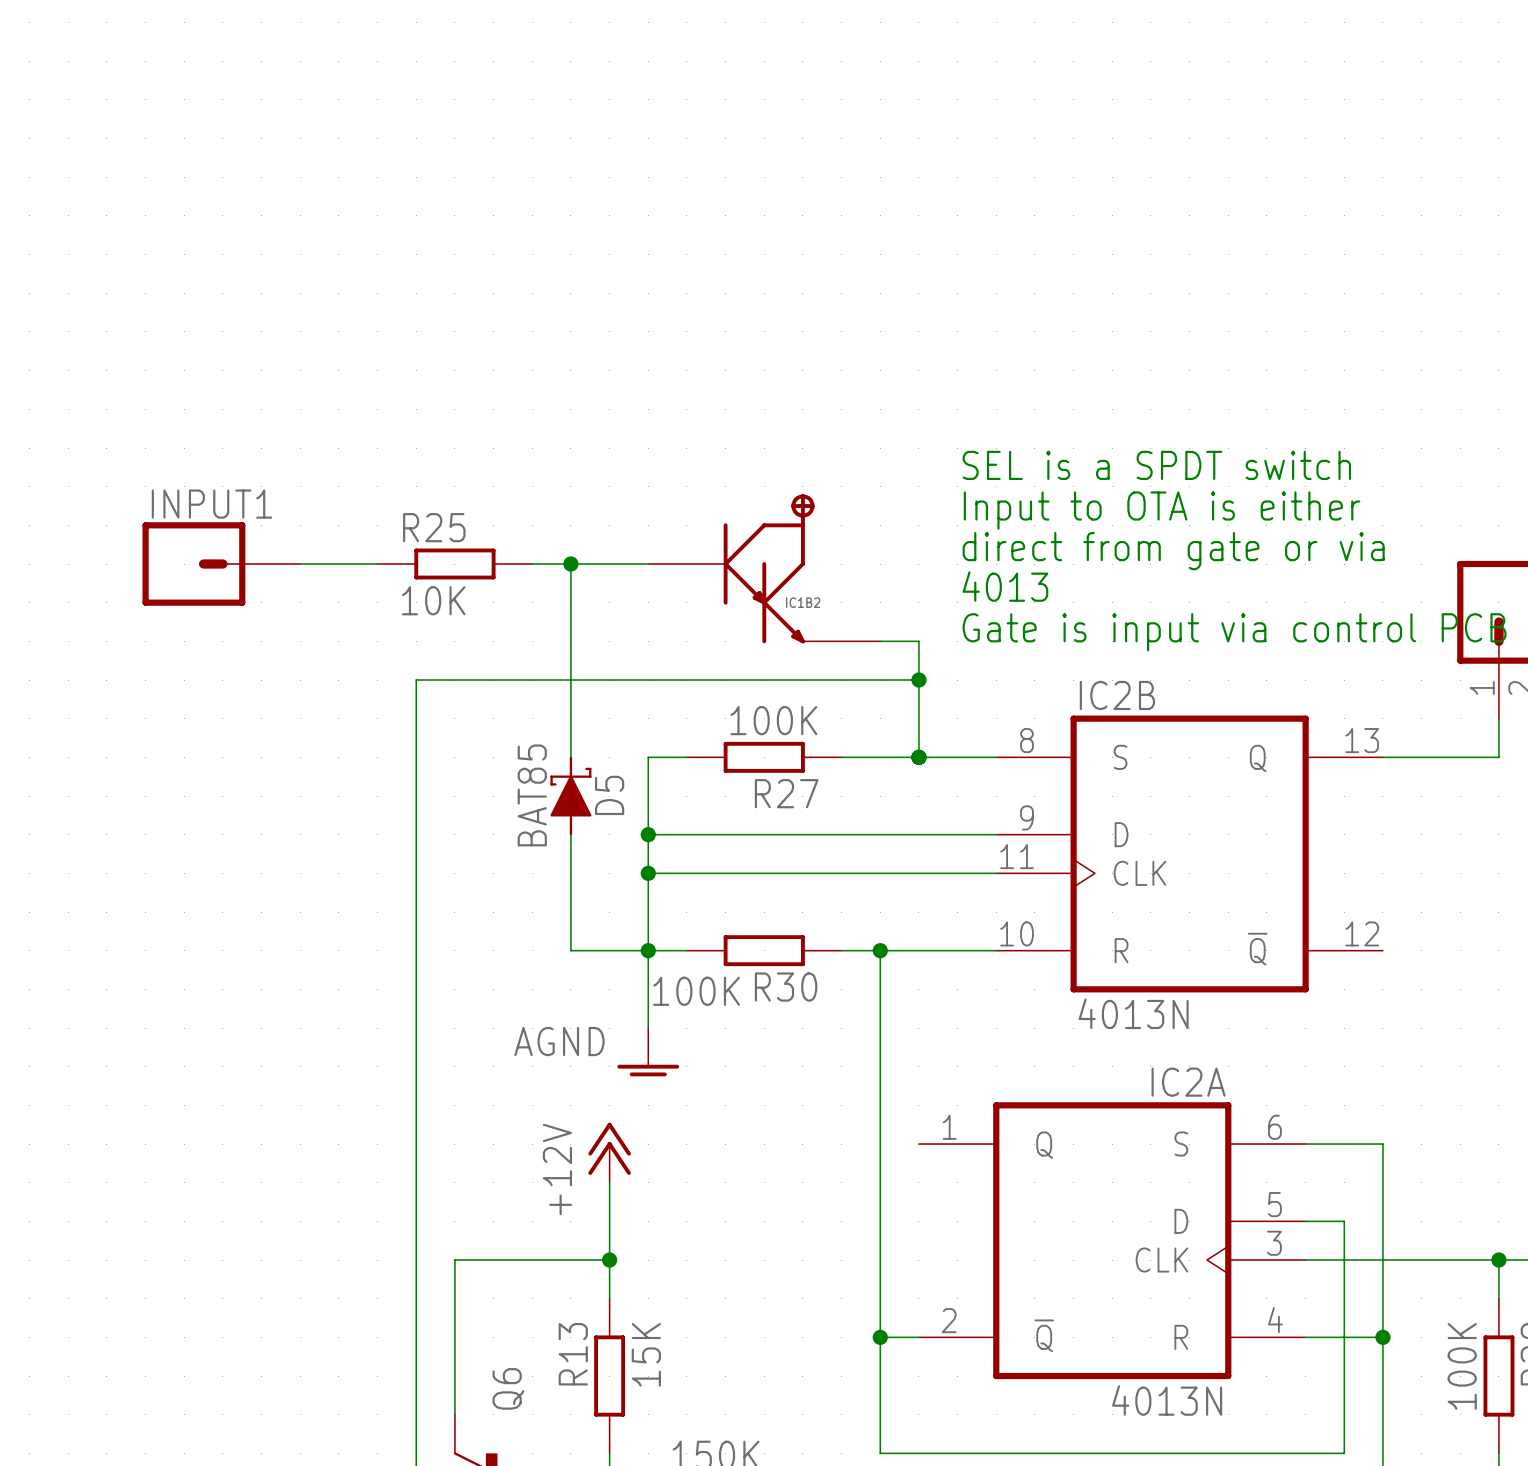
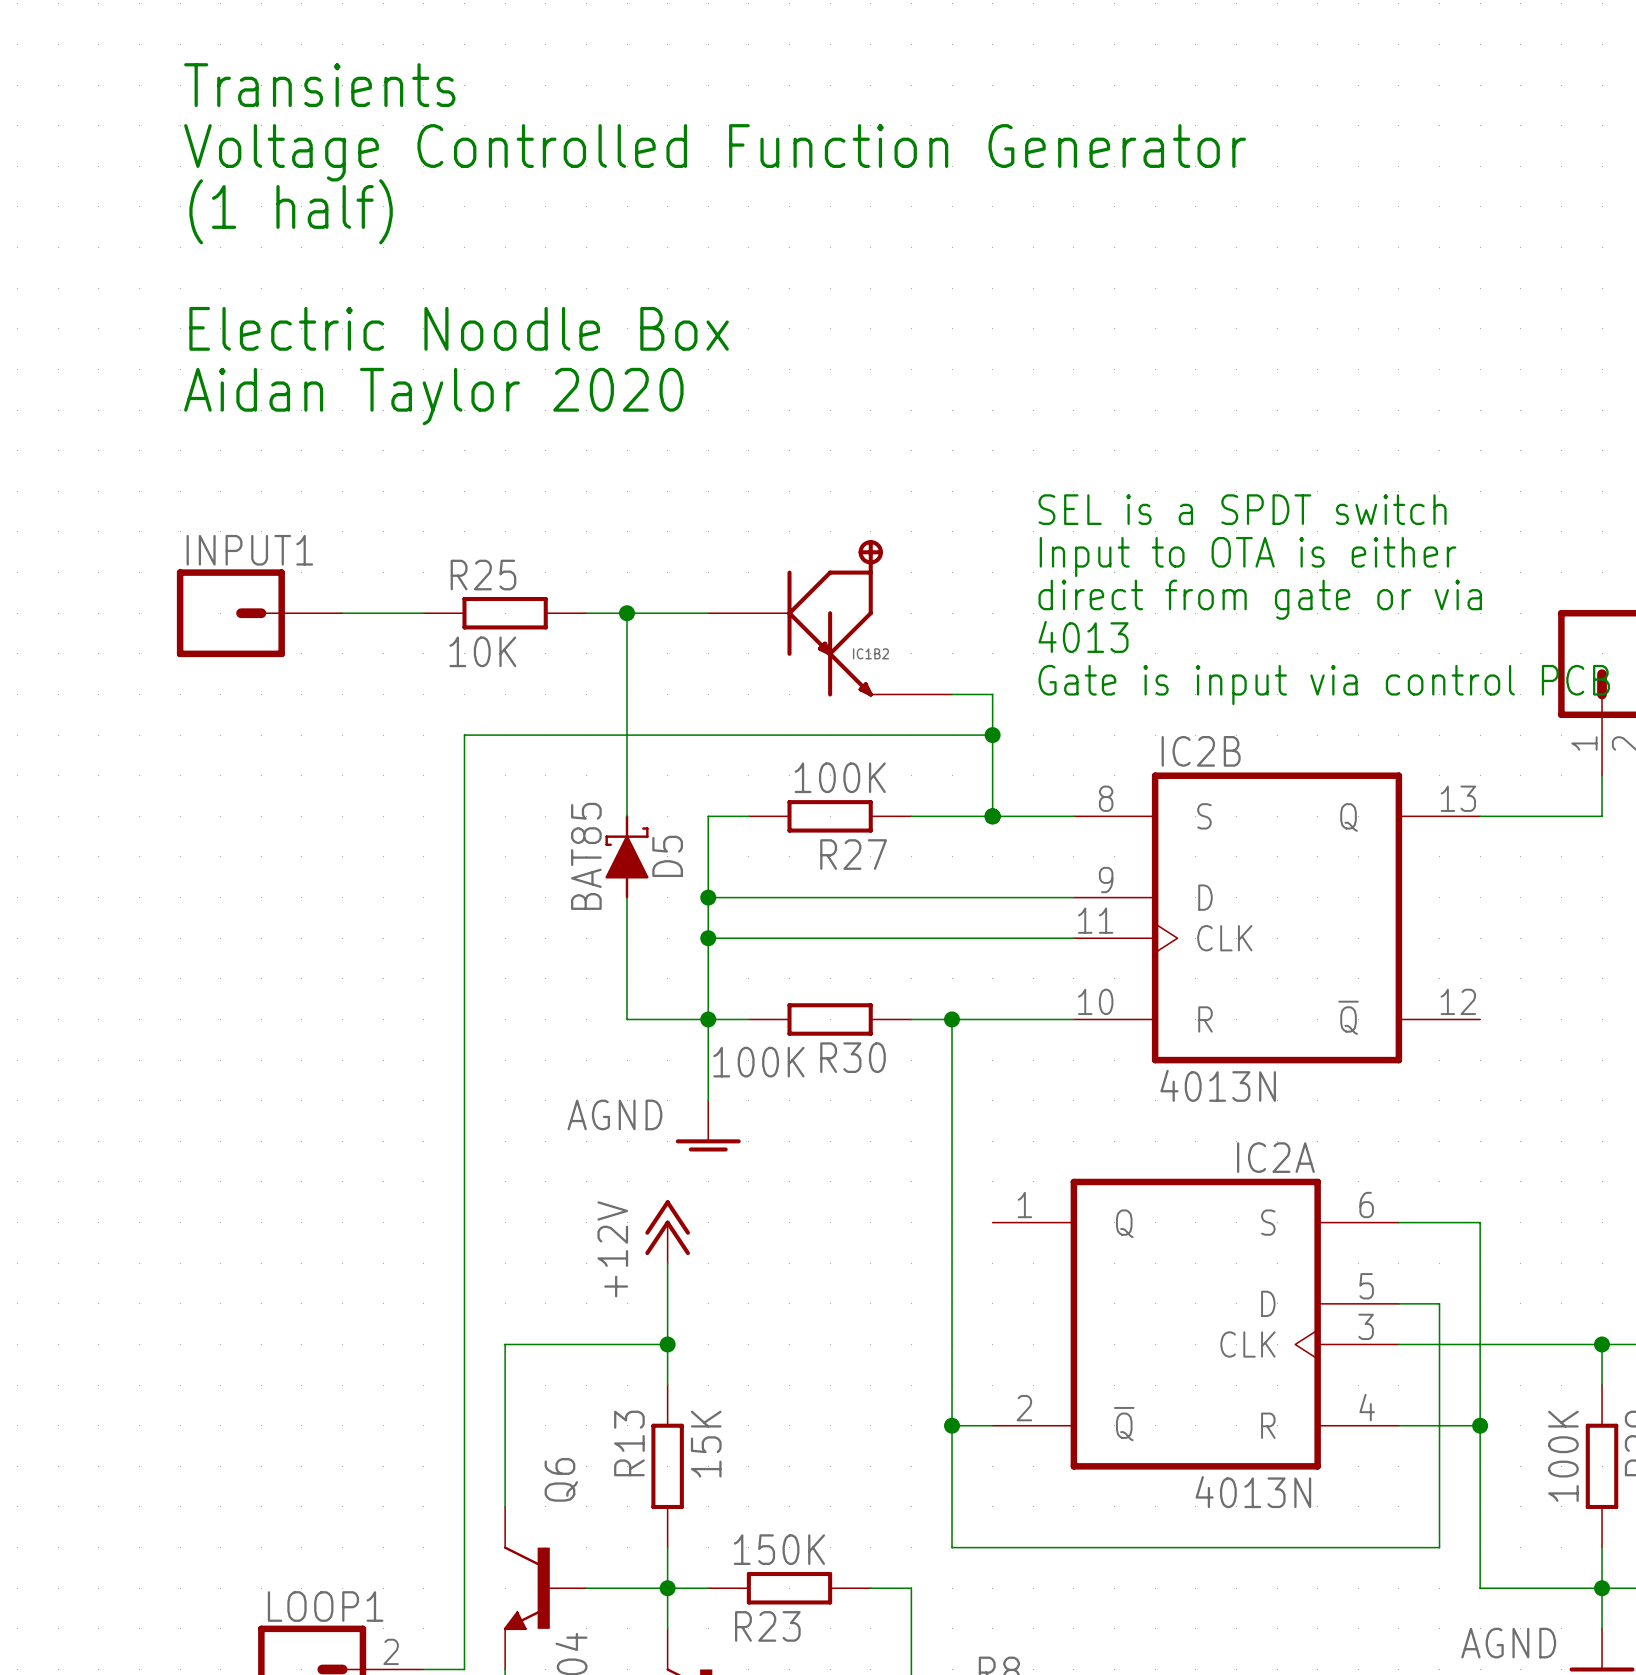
text: none -> Transients (319, 85)
text: none -> Voltage Controlled Function Generator (715, 152)
text: none -> (1 half) (291, 211)
text: none -> Electric Noodle Box (459, 328)
text: none -> Aidan Taylor 2020 (433, 396)

